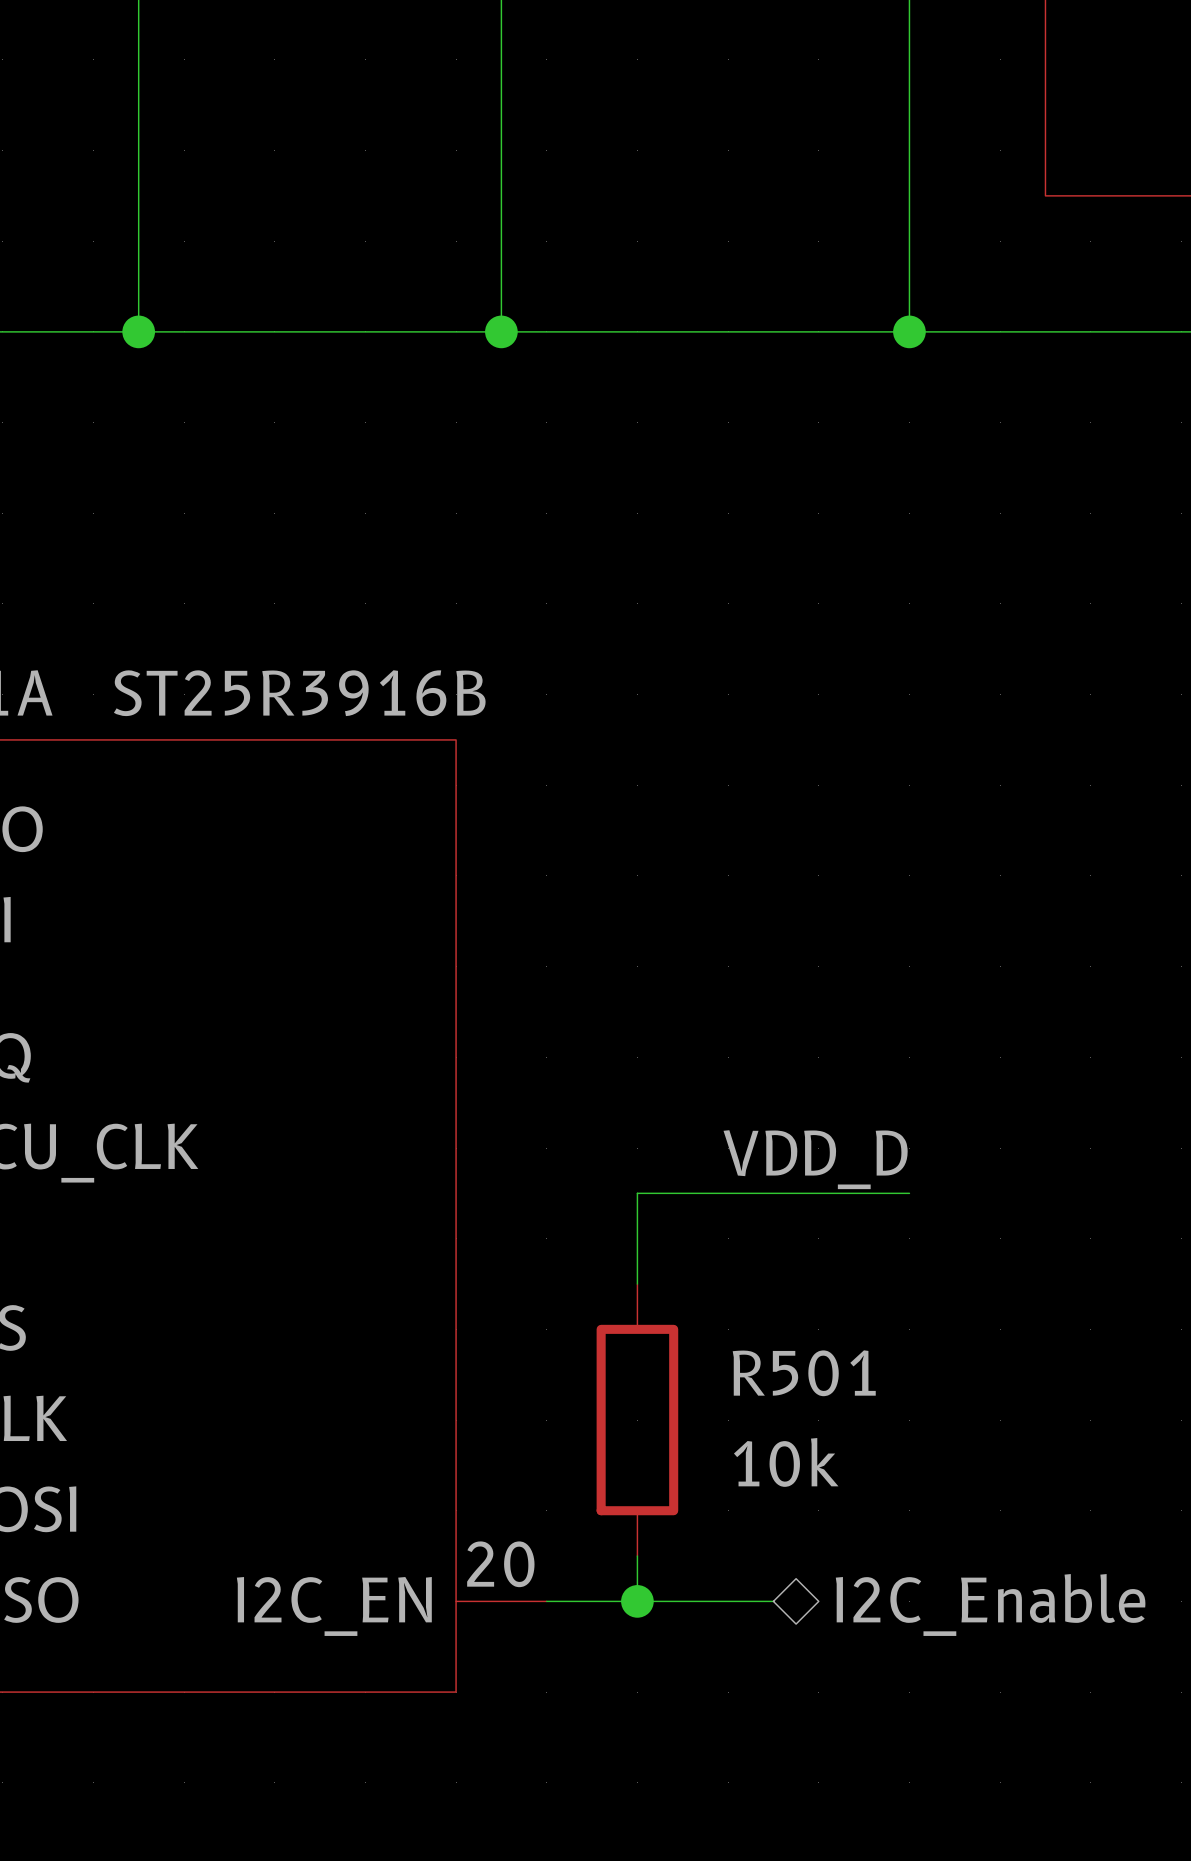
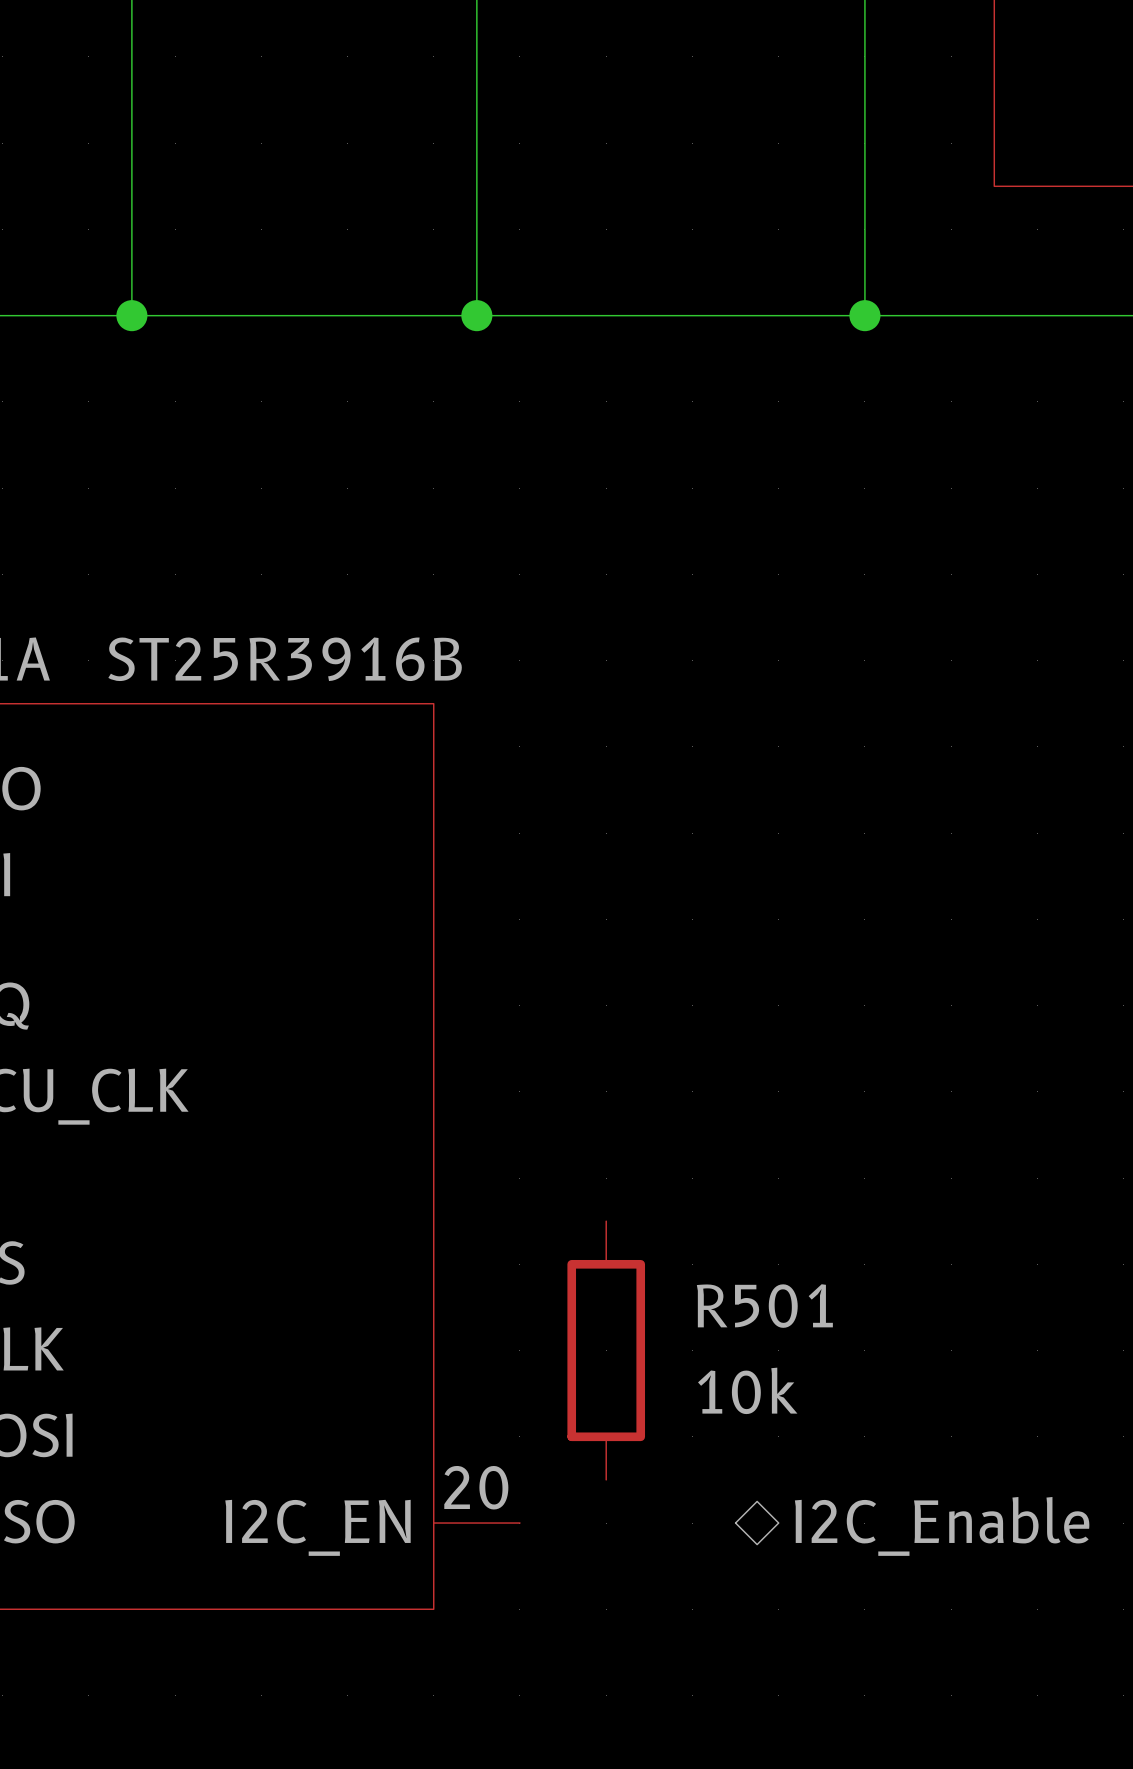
label: VDD_D (815, 1159) -> none
wire: (909, 1193) (637, 1193) (637, 1284) -> none
wire: (637, 1556) (637, 1601) -> none
wire: (546, 1601) (773, 1601) -> none
junction: (637, 1601) -> none

